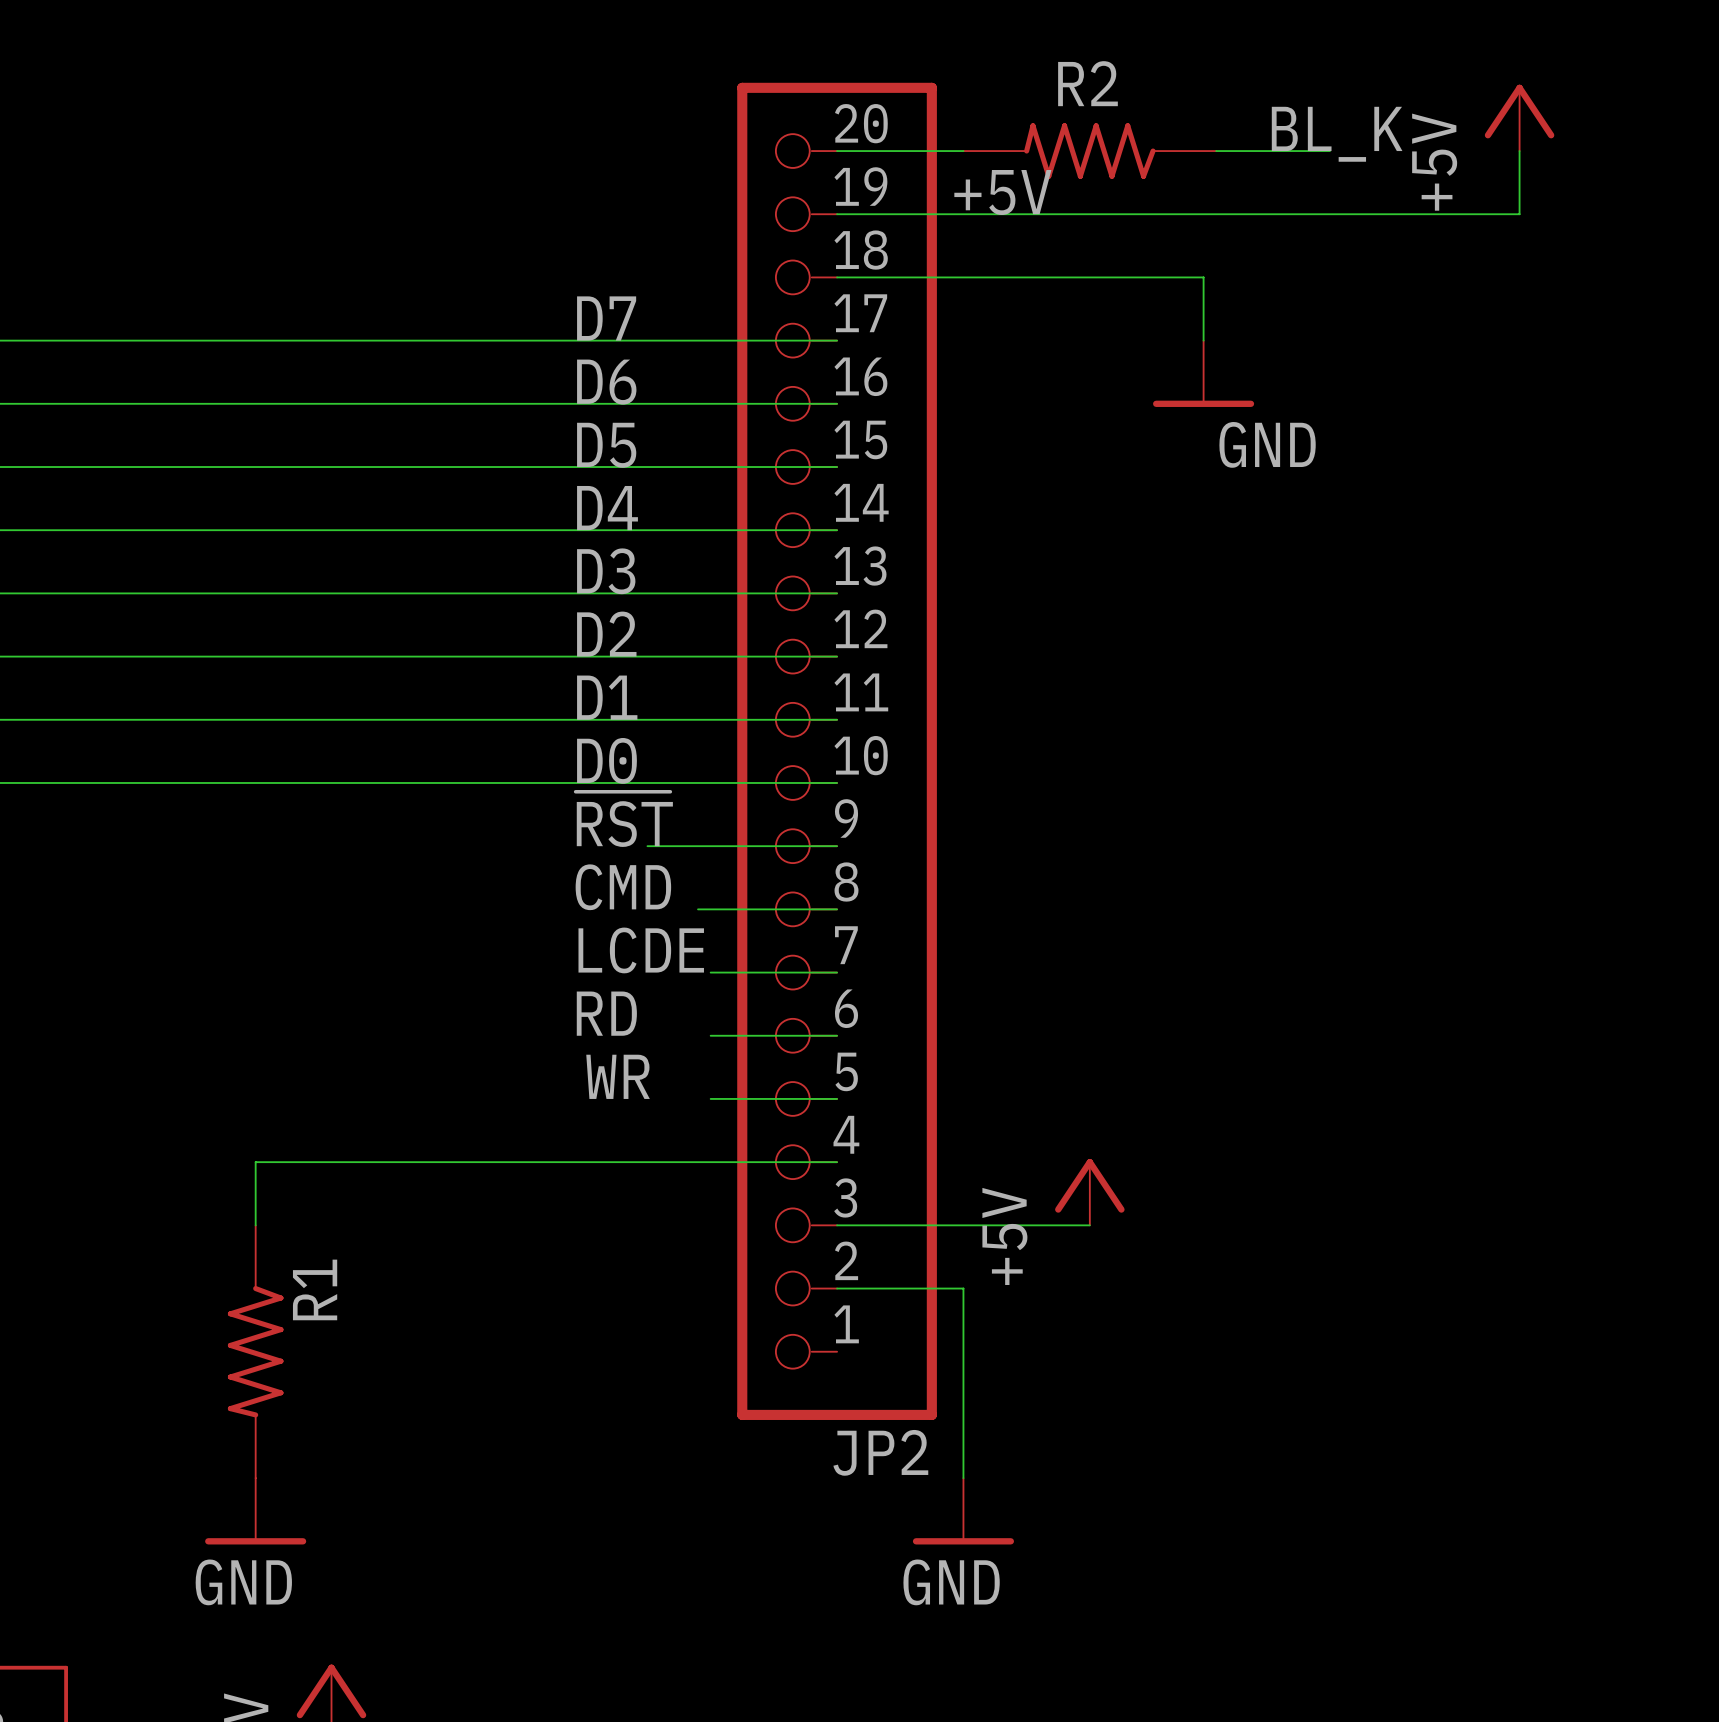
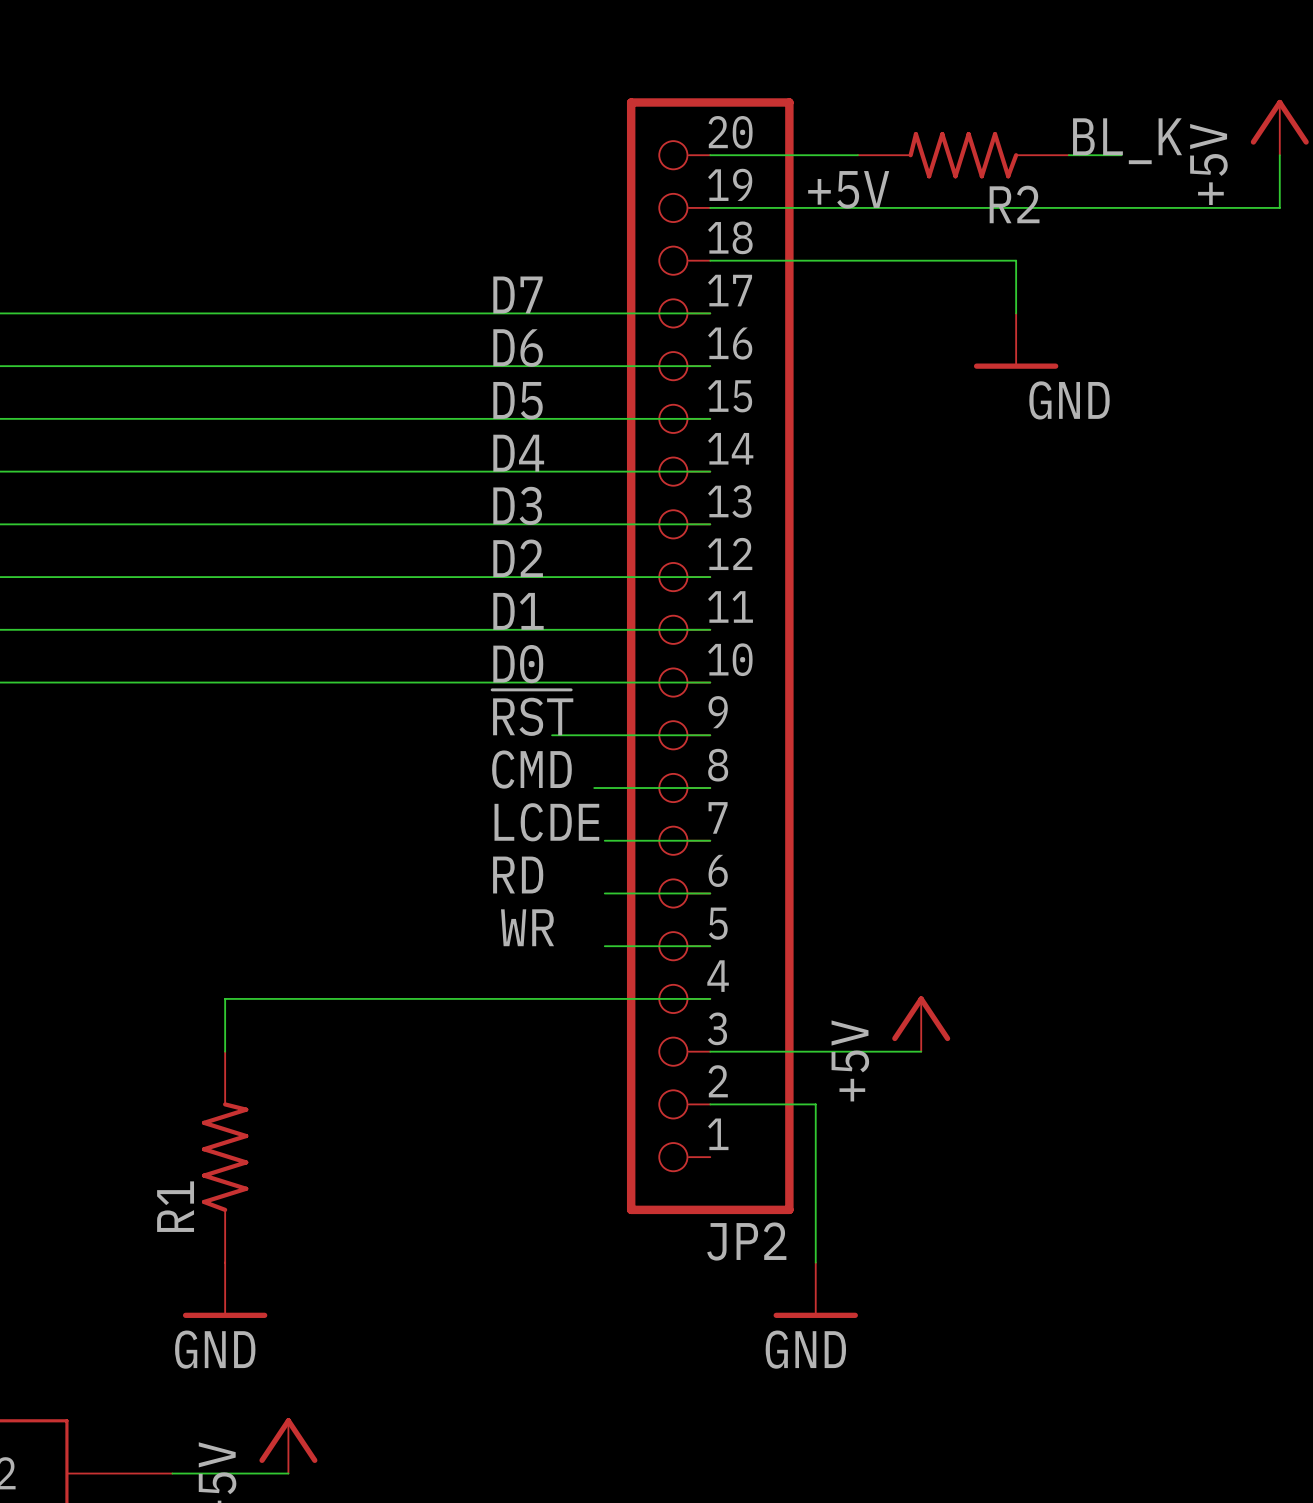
R2 name position: R2 (1087, 83) -> R2 (1014, 204)
R2 position: (1089, 151) -> (963, 155)
R1 rotation: 0° (255, 1351) -> 180° (225, 1157)

